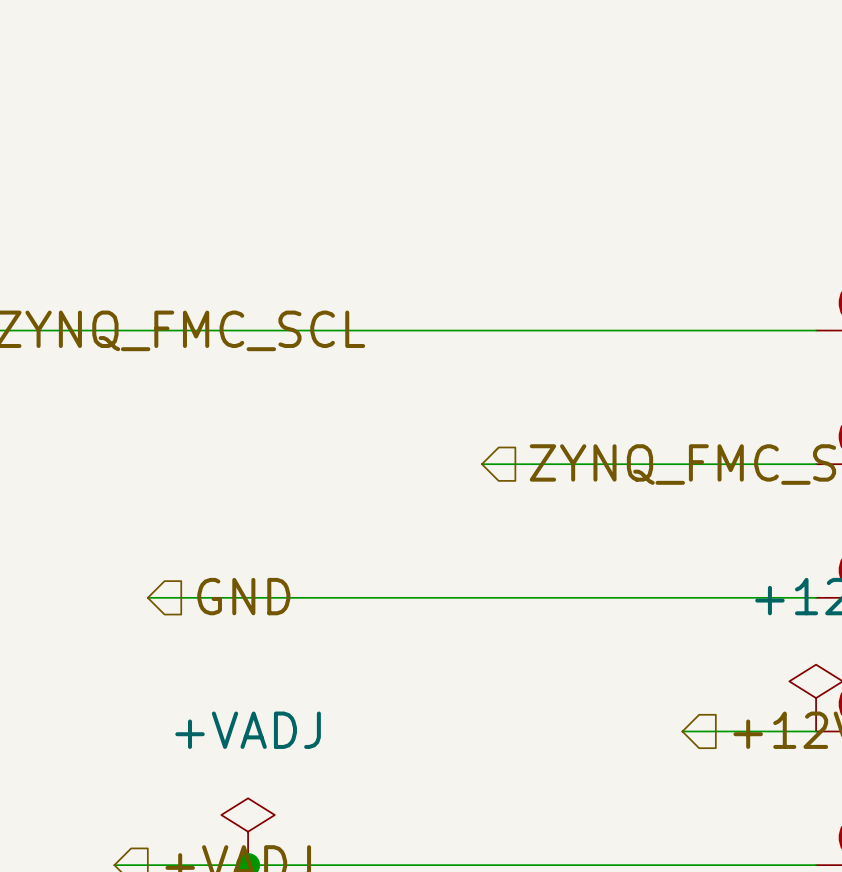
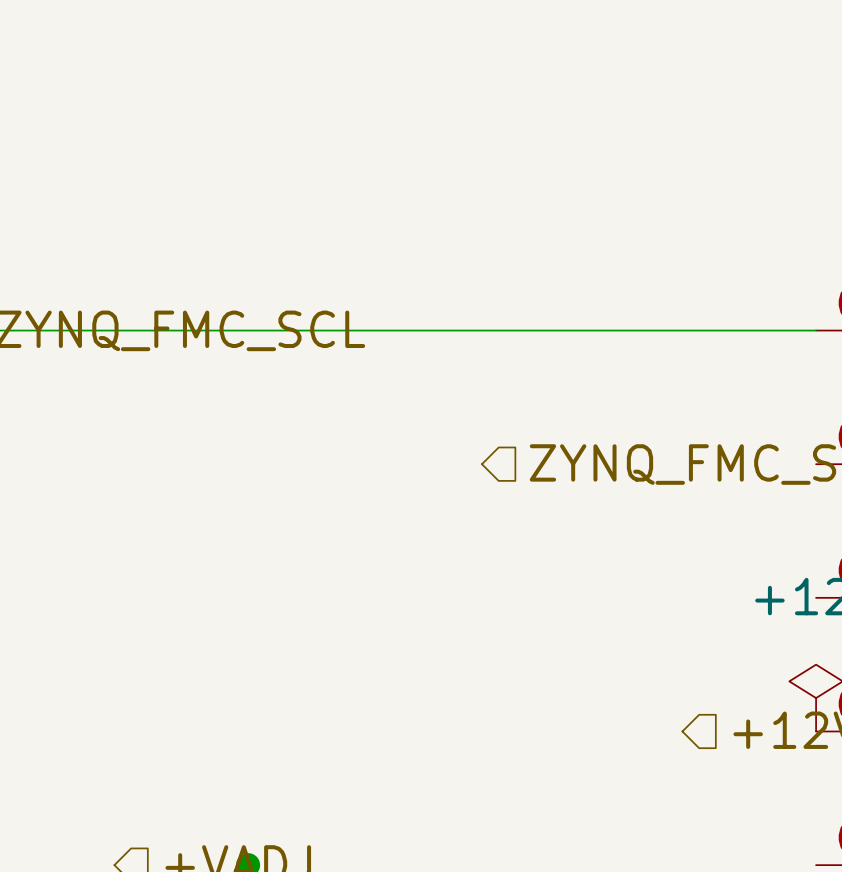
wire: (481, 464) (816, 464) -> none
hierarchical label: GND (243, 596) -> none
wire: (147, 597) (816, 597) -> none
wire: (682, 731) (816, 731) -> none
power symbol: +VADJ (248, 831) -> none
wire: (114, 865) (816, 865) -> none

